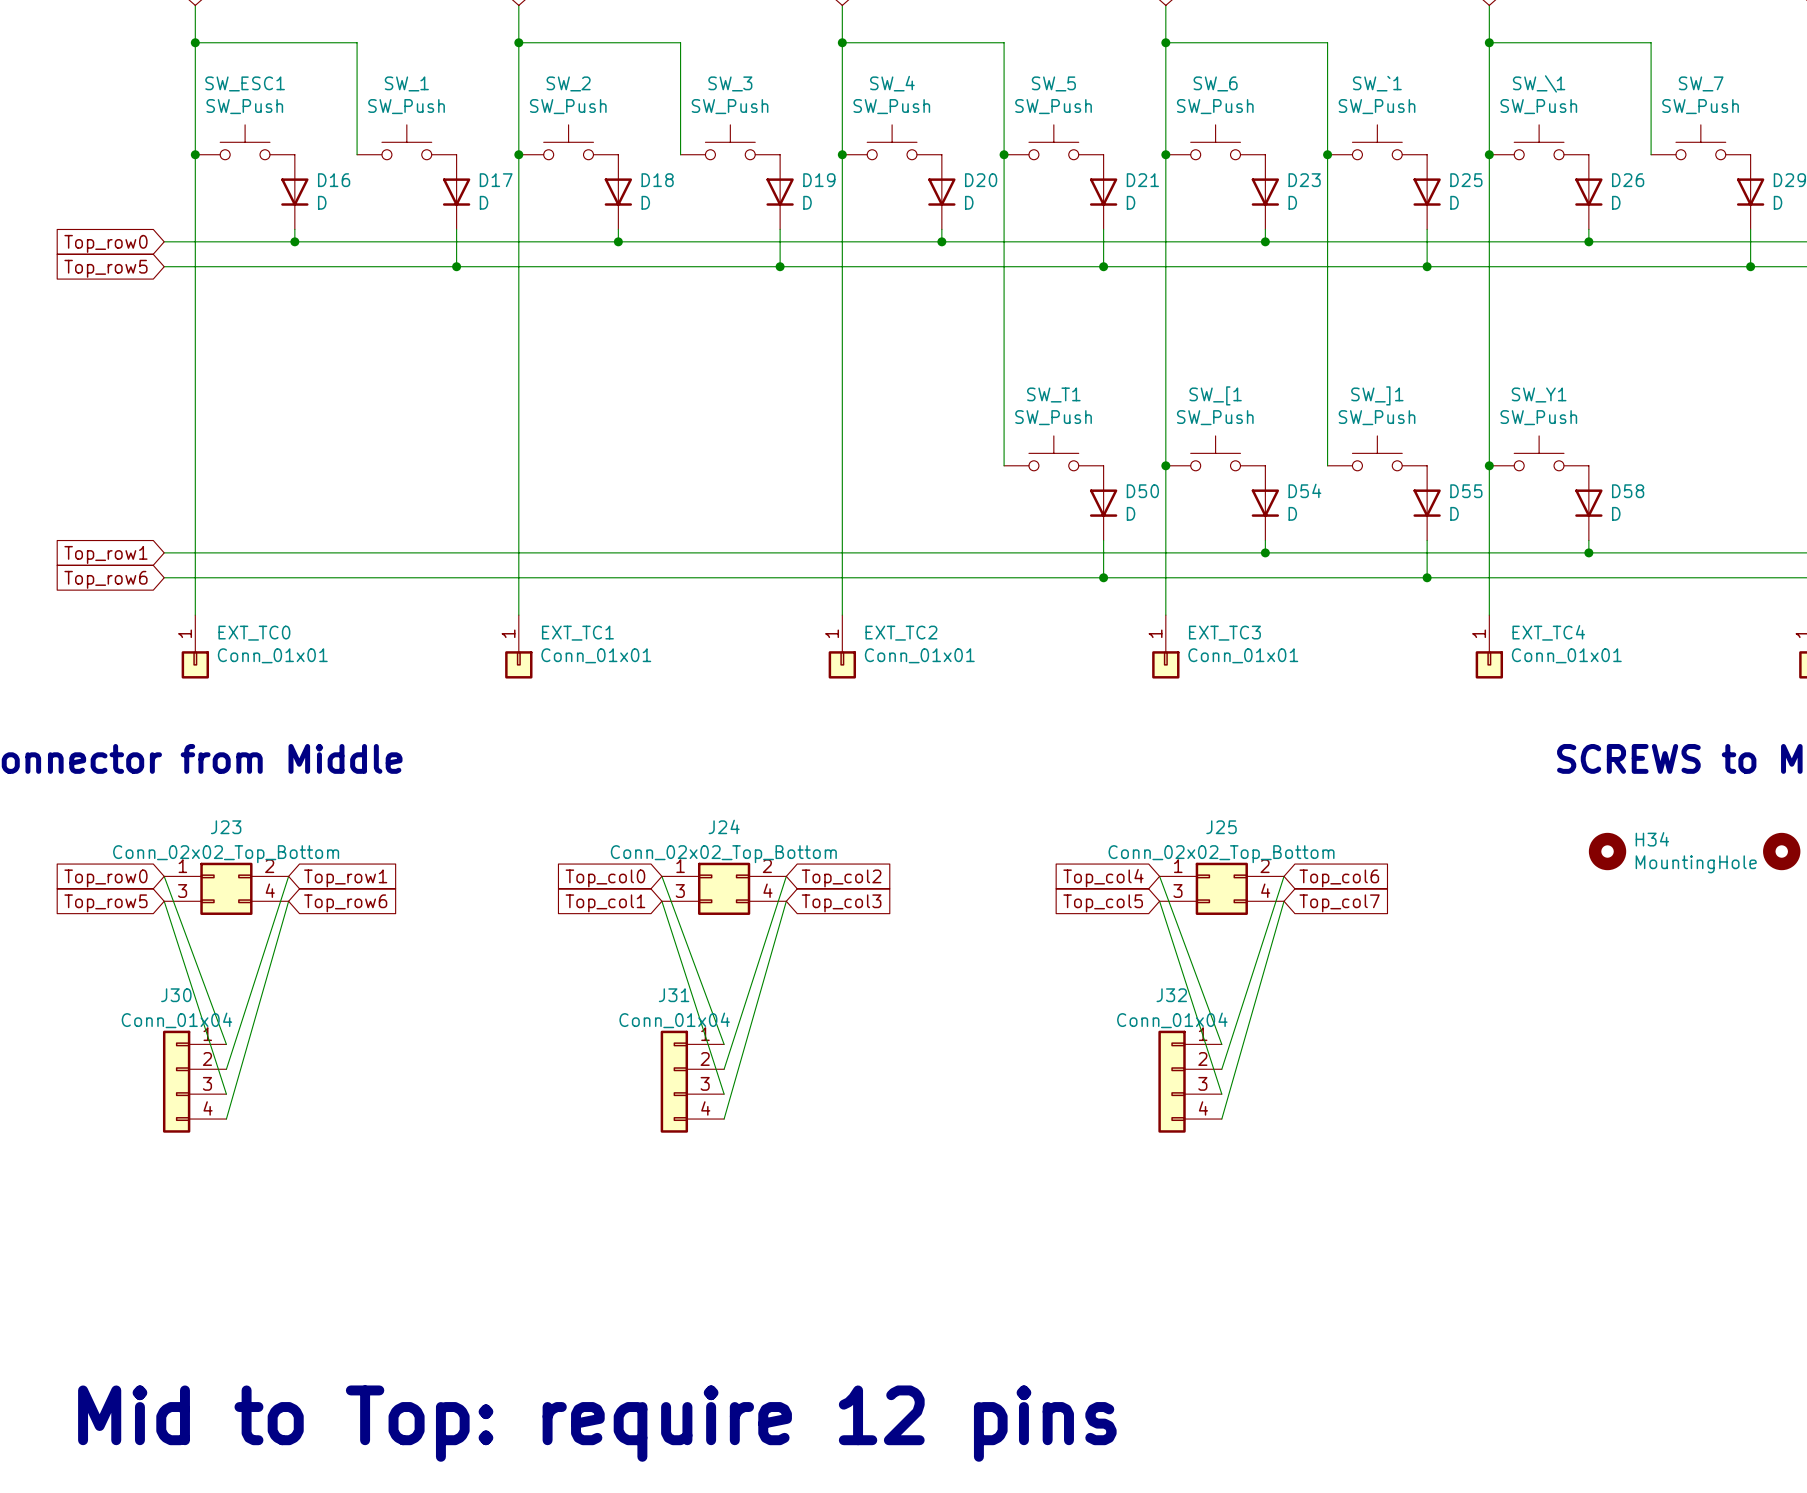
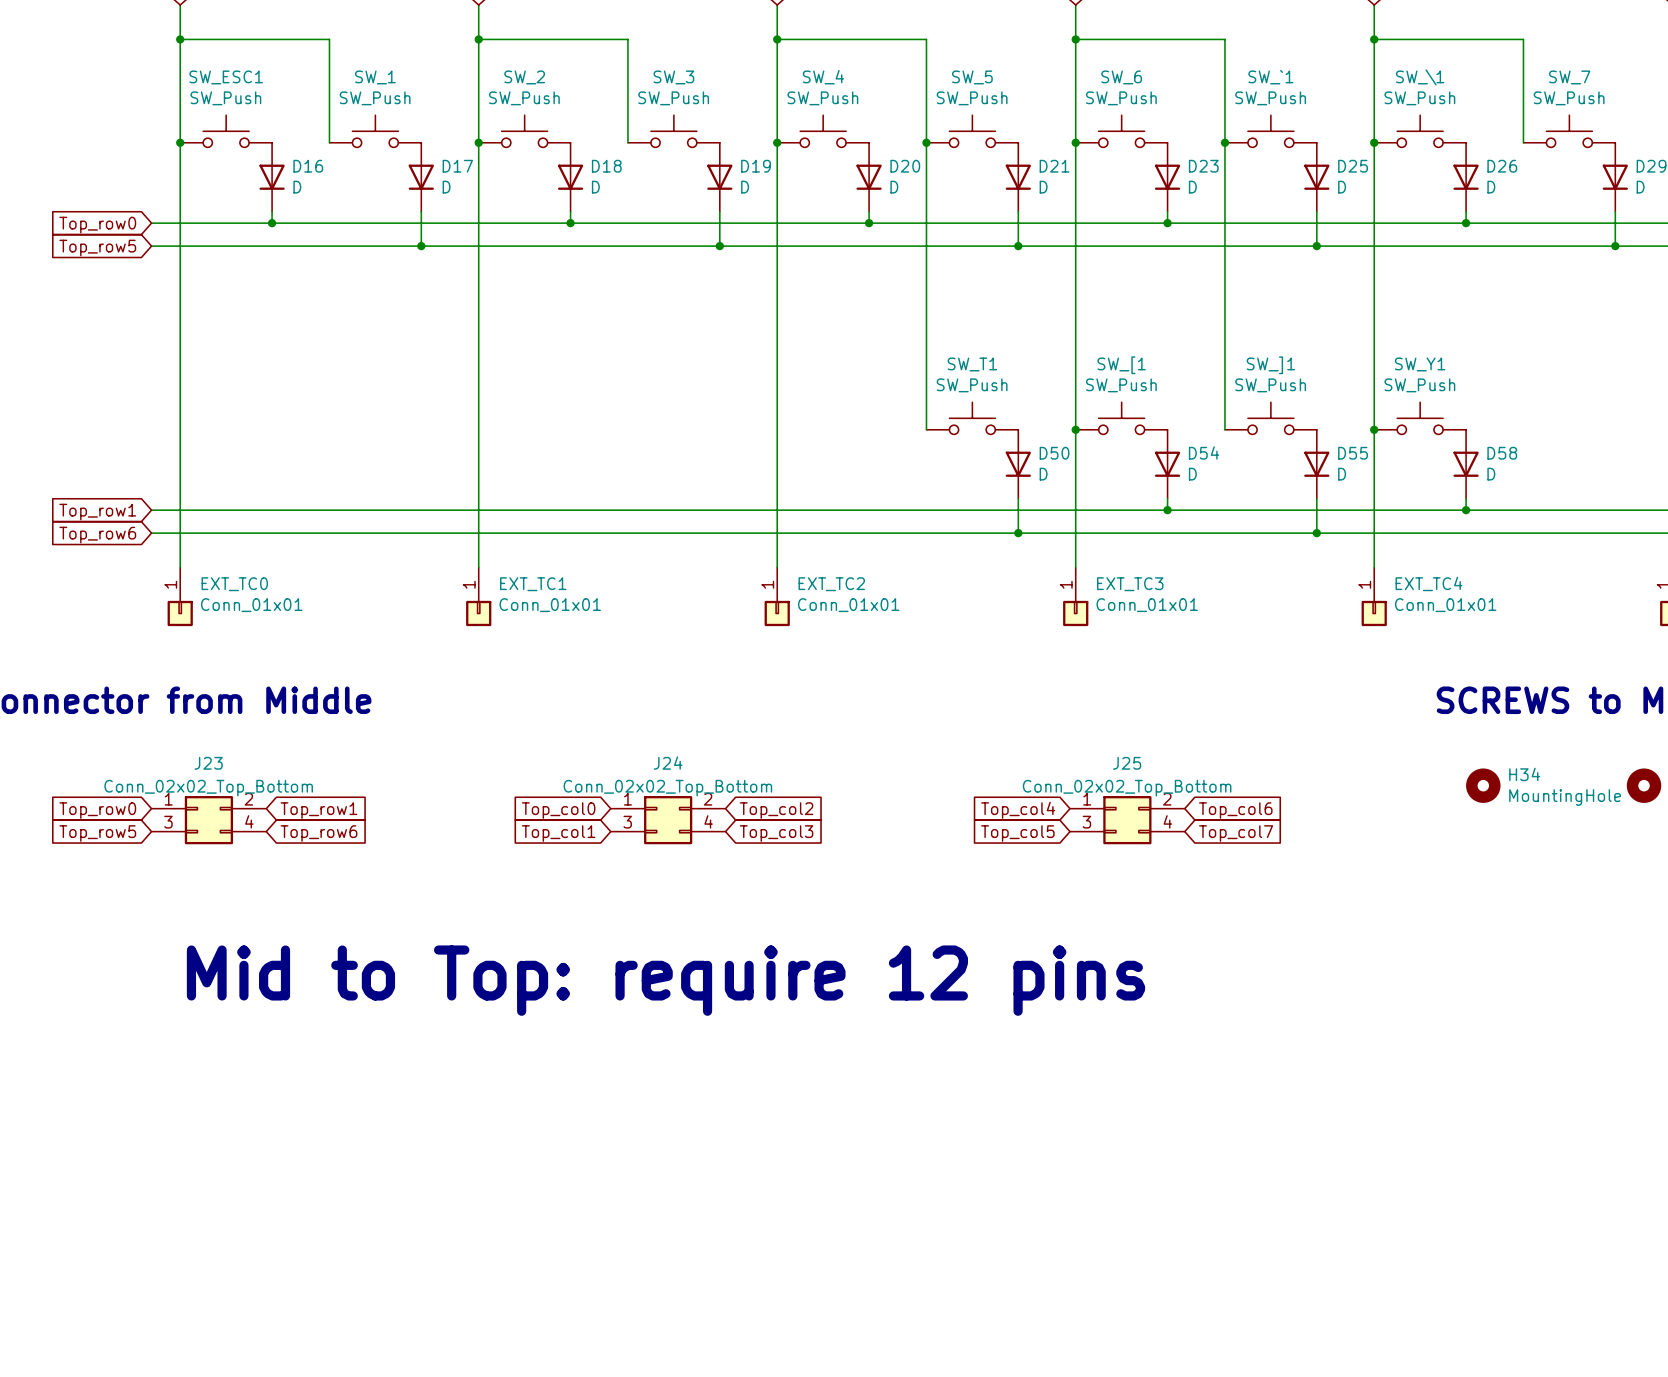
wire: (164, 876) (226, 1044) -> none
wire: (288, 876) (226, 1069) -> none
wire: (661, 876) (724, 1044) -> none
wire: (786, 876) (724, 1069) -> none
wire: (1159, 876) (1221, 1044) -> none
wire: (1284, 876) (1221, 1069) -> none
wire: (164, 901) (226, 1094) -> none
wire: (288, 901) (226, 1119) -> none
wire: (661, 901) (724, 1094) -> none
wire: (786, 901) (724, 1119) -> none
wire: (1159, 901) (1221, 1094) -> none
wire: (1284, 901) (1221, 1119) -> none
text: none -> Mid to Top: require 12 pins (665, 980)
J30: Conn_01x04 (194, 1081) -> none
J31: Conn_01x04 (692, 1081) -> none
J32: Conn_01x04 (1190, 1081) -> none
text: Mid to Top: require 12 pins (597, 1423) -> none

